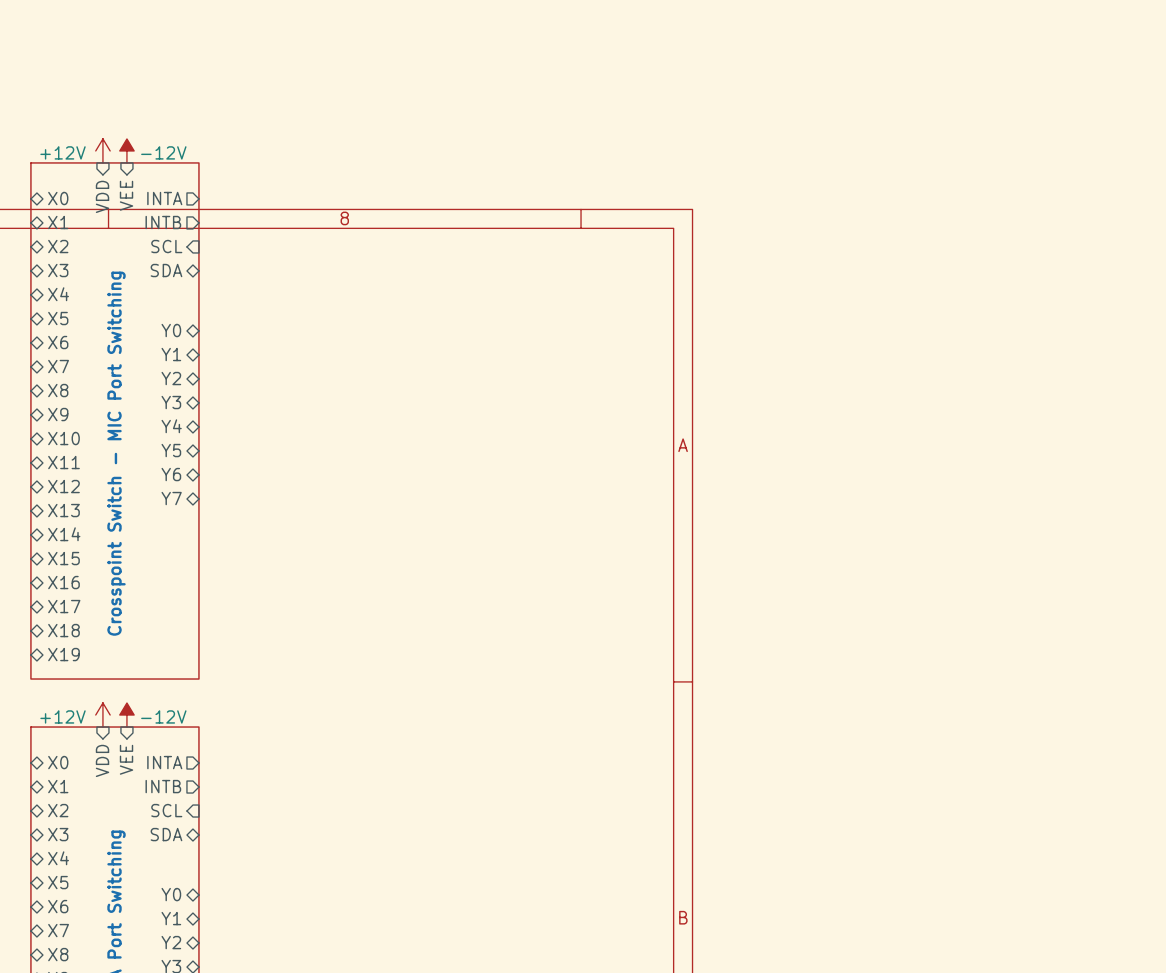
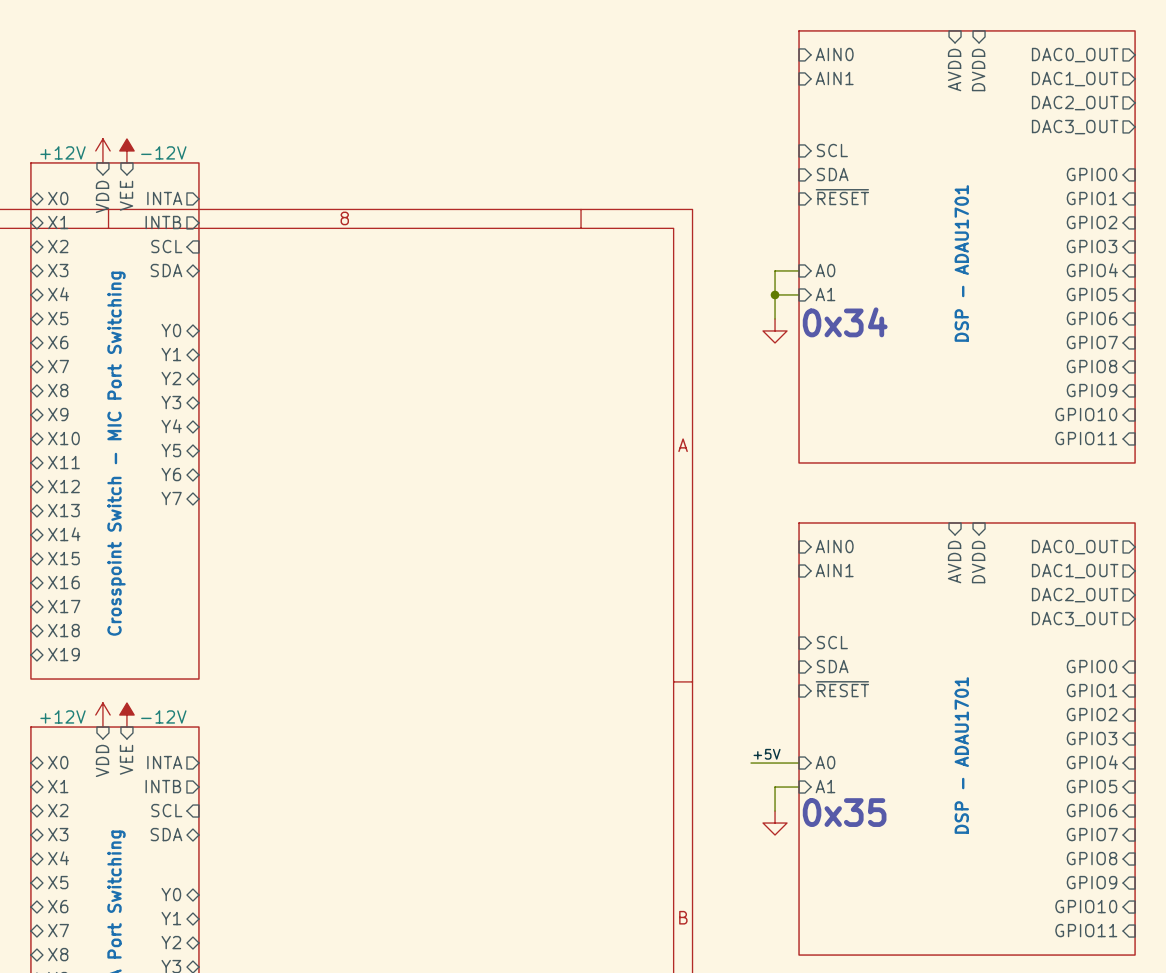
sheet pin: none -> AIN0 (834, 54)
sheet pin: none -> DAC0_OUT (1075, 55)
sheet pin: none -> AVDD (954, 69)
sheet pin: none -> DVDD (978, 69)
sheet pin: none -> AIN1 (834, 78)
sheet pin: none -> DAC1_OUT (1075, 79)
sheet pin: none -> DAC2_OUT (1075, 103)
sheet pin: none -> DAC3_OUT (1075, 127)
sheet pin: none -> SCL (832, 150)
sheet pin: none -> SDA (832, 174)
sheet pin: none -> GPIO0 (1092, 174)
sheet pin: none -> ~{RESET} (842, 197)
sheet pin: none -> GPIO1 (1092, 198)
sheet pin: none -> GPIO2 (1092, 222)
sheet DSP - ADAU1701: none -> (967, 246)
sheet pin: none -> GPIO3 (1092, 246)
wire: none -> (799, 270) (775, 270) (775, 318)
sheet pin: none -> A0 (825, 270)
sheet pin: none -> GPIO4 (1092, 270)
wire: none -> (775, 294) (799, 294)
junction: none -> (775, 294)
sheet pin: none -> A1 (825, 294)
sheet pin: none -> GPIO5 (1092, 294)
sheet pin: none -> GPIO6 (1092, 318)
text: none -> 0x34 (845, 322)
power symbol: none -> (775, 330)
sheet pin: none -> GPIO7 (1092, 342)
sheet pin: none -> GPIO8 (1092, 366)
sheet pin: none -> GPIO9 (1092, 390)
sheet pin: none -> GPIO10 (1086, 414)
sheet pin: none -> GPIO11 (1086, 438)
sheet pin: none -> AIN0 (834, 546)
sheet pin: none -> DAC0_OUT (1075, 547)
sheet pin: none -> AVDD (954, 562)
sheet pin: none -> DVDD (978, 562)
sheet pin: none -> AIN1 (834, 570)
sheet pin: none -> DAC1_OUT (1075, 571)
sheet pin: none -> DAC2_OUT (1075, 595)
sheet pin: none -> DAC3_OUT (1075, 619)
sheet pin: none -> SCL (832, 642)
sheet pin: none -> SDA (832, 666)
sheet pin: none -> GPIO0 (1092, 666)
sheet pin: none -> ~{RESET} (842, 689)
sheet pin: none -> GPIO1 (1092, 690)
sheet pin: none -> GPIO2 (1092, 714)
sheet pin: none -> GPIO3 (1092, 738)
sheet DSP - ADAU1701: none -> (967, 739)
label: none -> +5V (767, 754)
sheet pin: none -> A0 (825, 762)
sheet pin: none -> GPIO4 (1092, 762)
wire: none -> (751, 763) (799, 763)
sheet pin: none -> A1 (825, 786)
sheet pin: none -> GPIO5 (1092, 786)
wire: none -> (799, 787) (775, 787) (775, 811)
sheet pin: none -> GPIO6 (1092, 810)
text: none -> 0x35 (844, 812)
power symbol: none -> (775, 823)
sheet pin: none -> GPIO7 (1092, 834)
sheet pin: none -> GPIO8 (1092, 858)
sheet pin: none -> GPIO9 (1092, 882)
sheet pin: none -> GPIO10 (1086, 906)
sheet pin: none -> GPIO11 (1086, 930)

